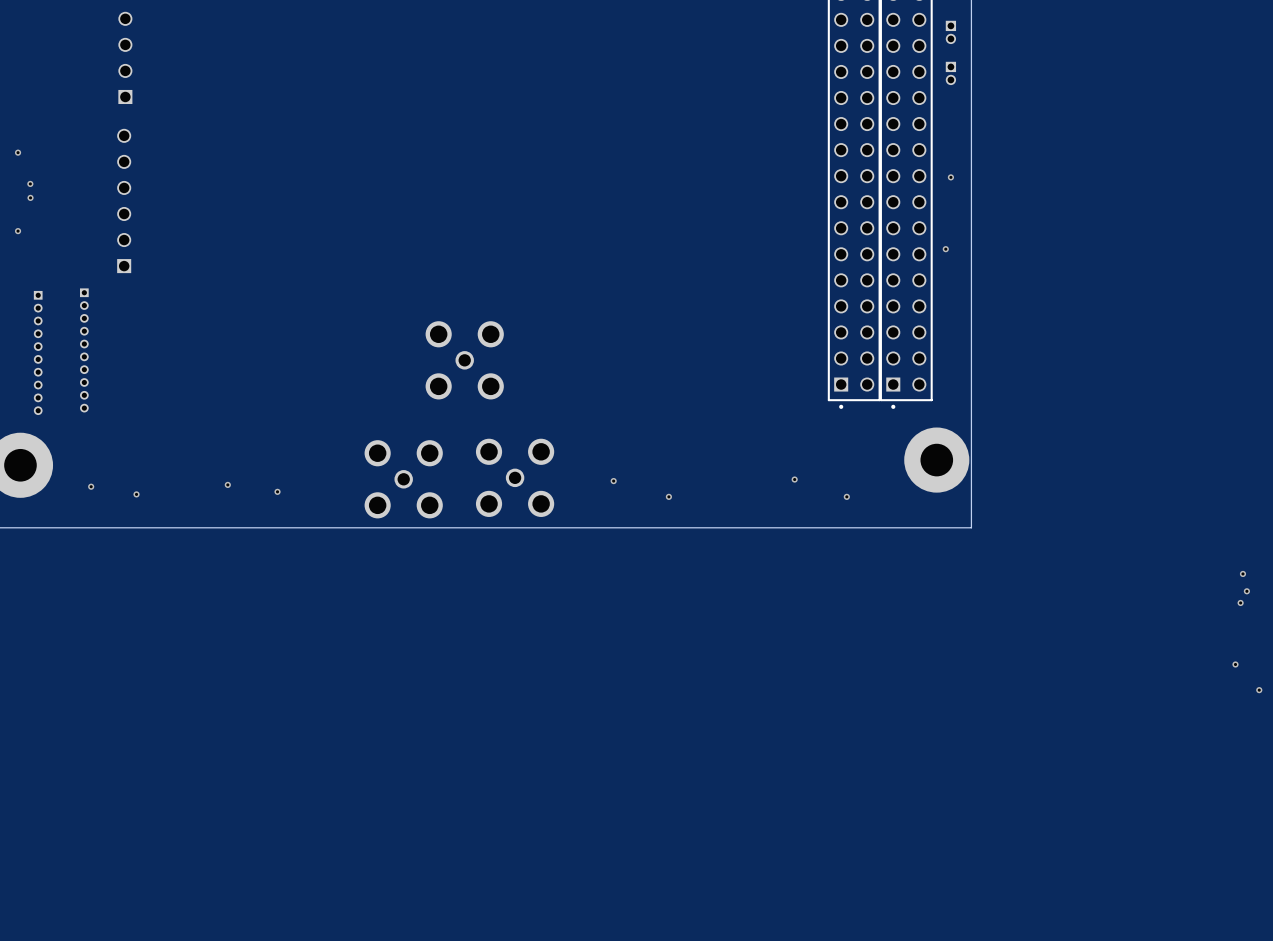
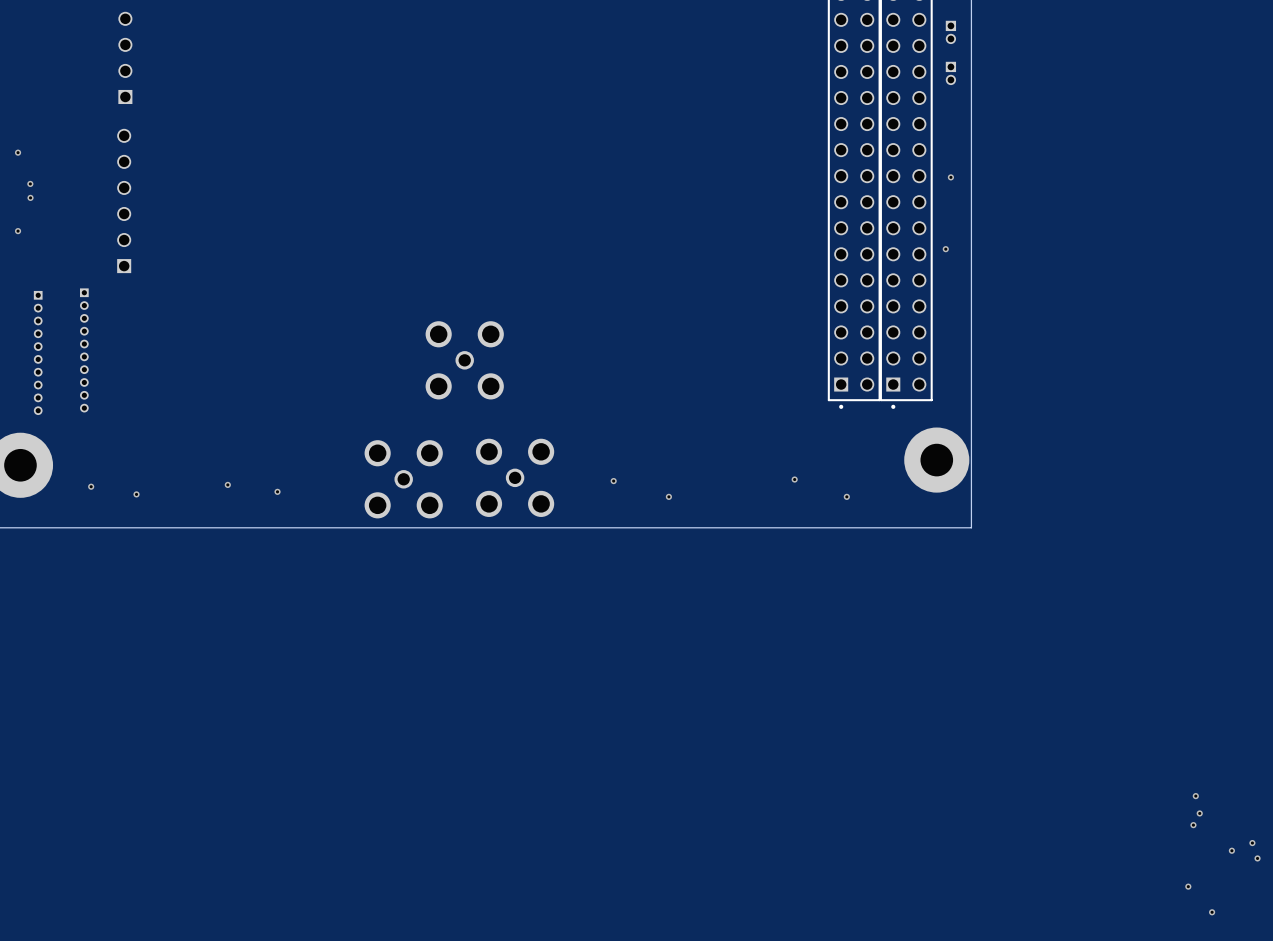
via: (1242, 573) -> none
via: (1246, 591) -> none
via: (1240, 602) -> none
via: (1235, 664) -> none
via: (1259, 690) -> none
via: none -> (1195, 796)
via: none -> (1199, 813)
via: none -> (1193, 825)
via: none -> (1252, 843)
via: none -> (1231, 850)
via: none -> (1257, 858)
via: none -> (1188, 886)
via: none -> (1212, 912)

